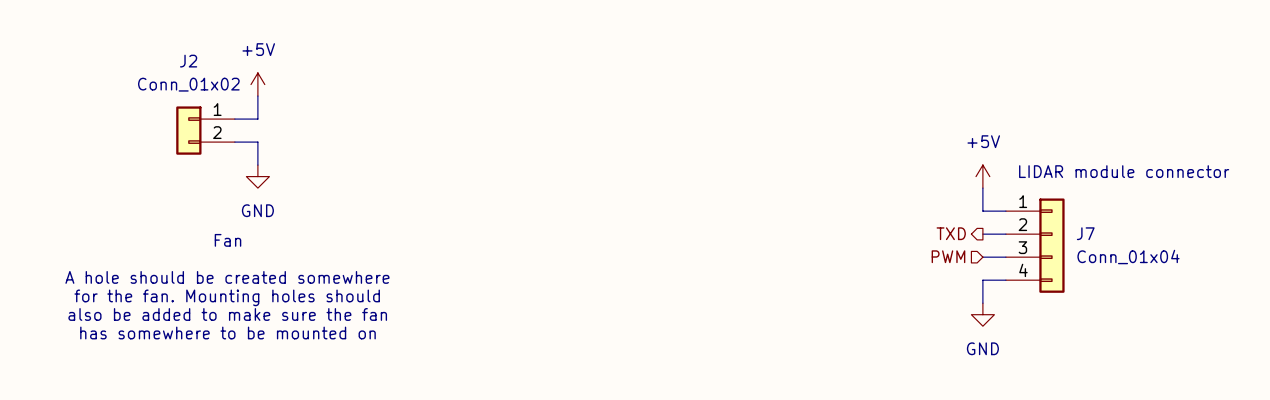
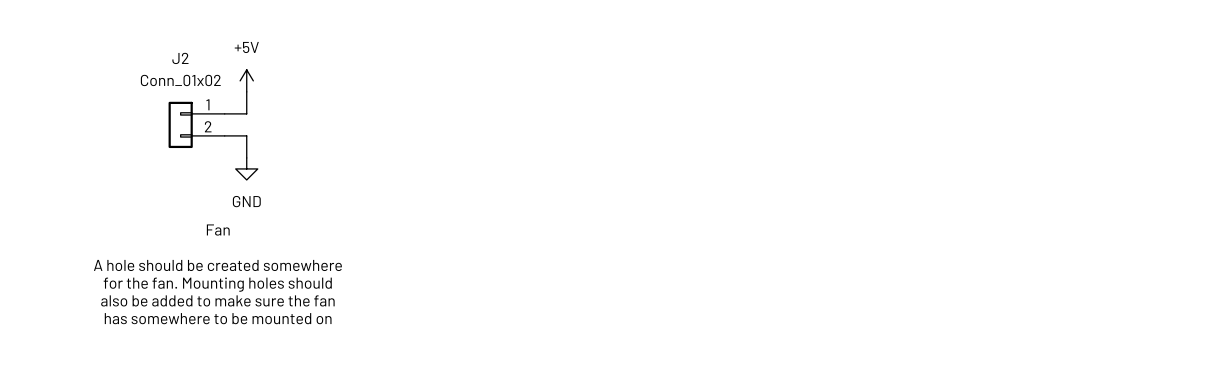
text: LIDAR module connector (1124, 171) -> none
power symbol: +5V (982, 176) -> none
wire: (982, 188) (982, 211) (1005, 211) -> none
hierarchical label: TXD (951, 233) -> none
wire: (982, 234) (1005, 234) -> none
J7: Conn_01x04 (1035, 245) -> none
hierarchical label: PWM (948, 256) -> none
wire: (982, 257) (1005, 257) -> none
wire: (1005, 280) (982, 280) (982, 303) -> none
power symbol: GND (982, 314) -> none

